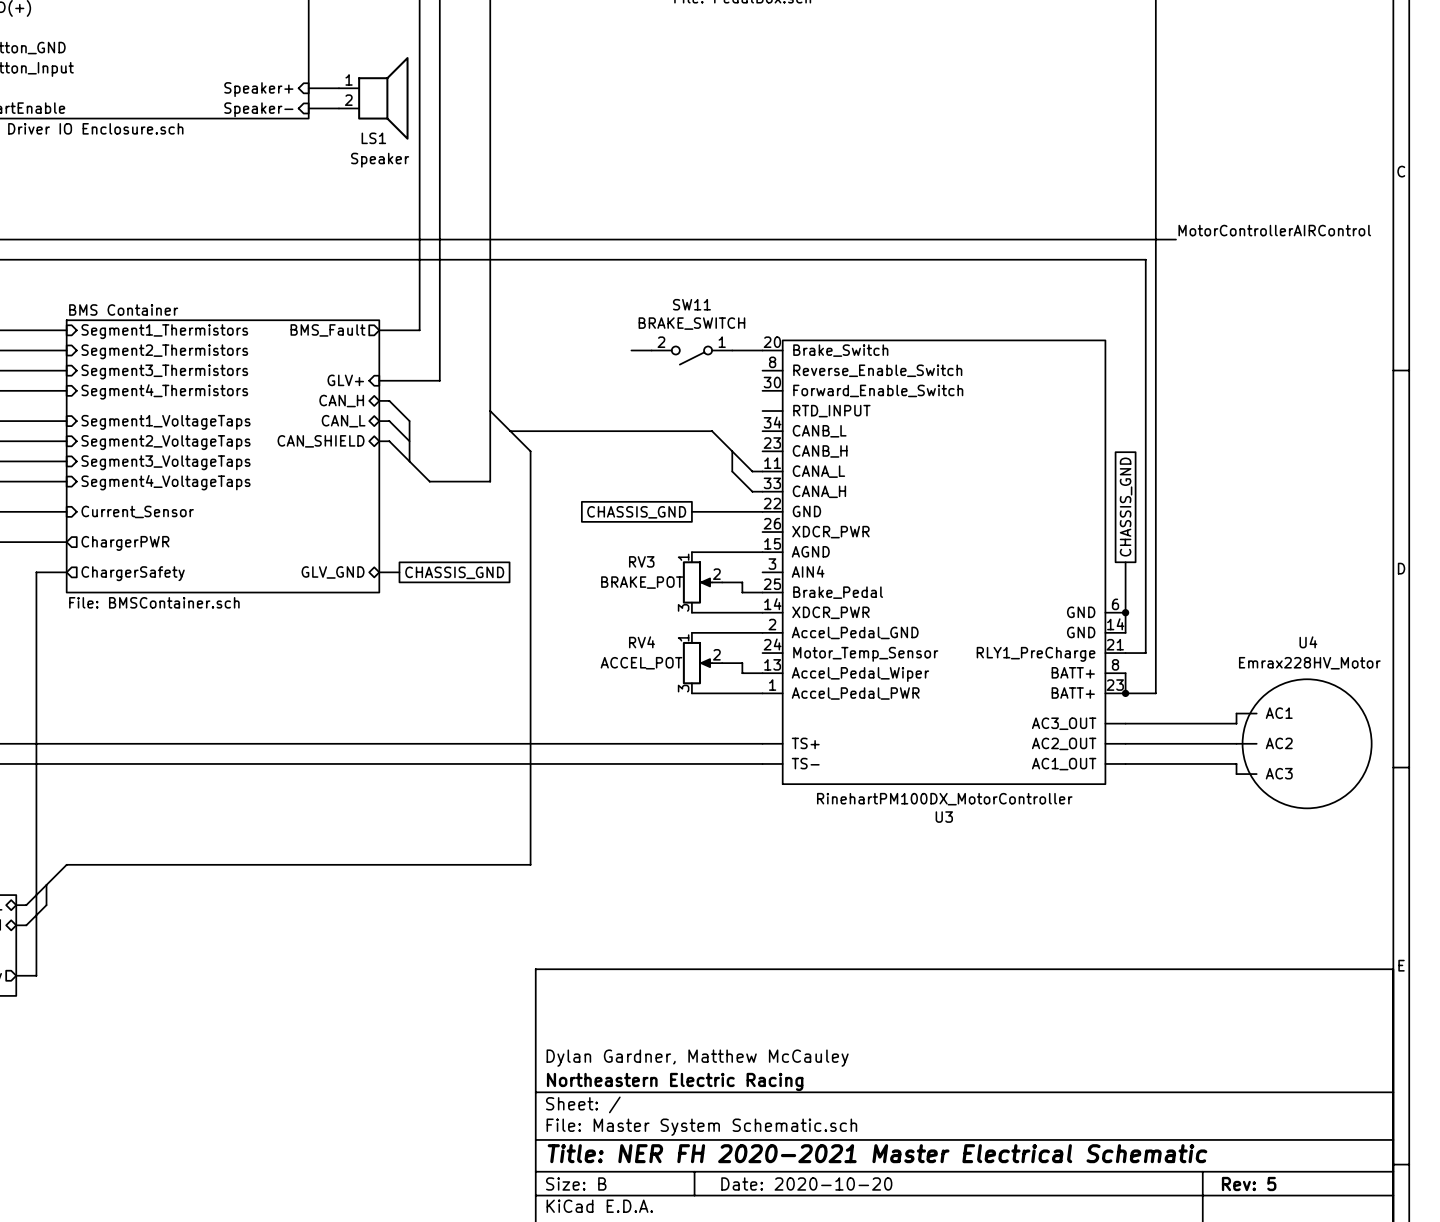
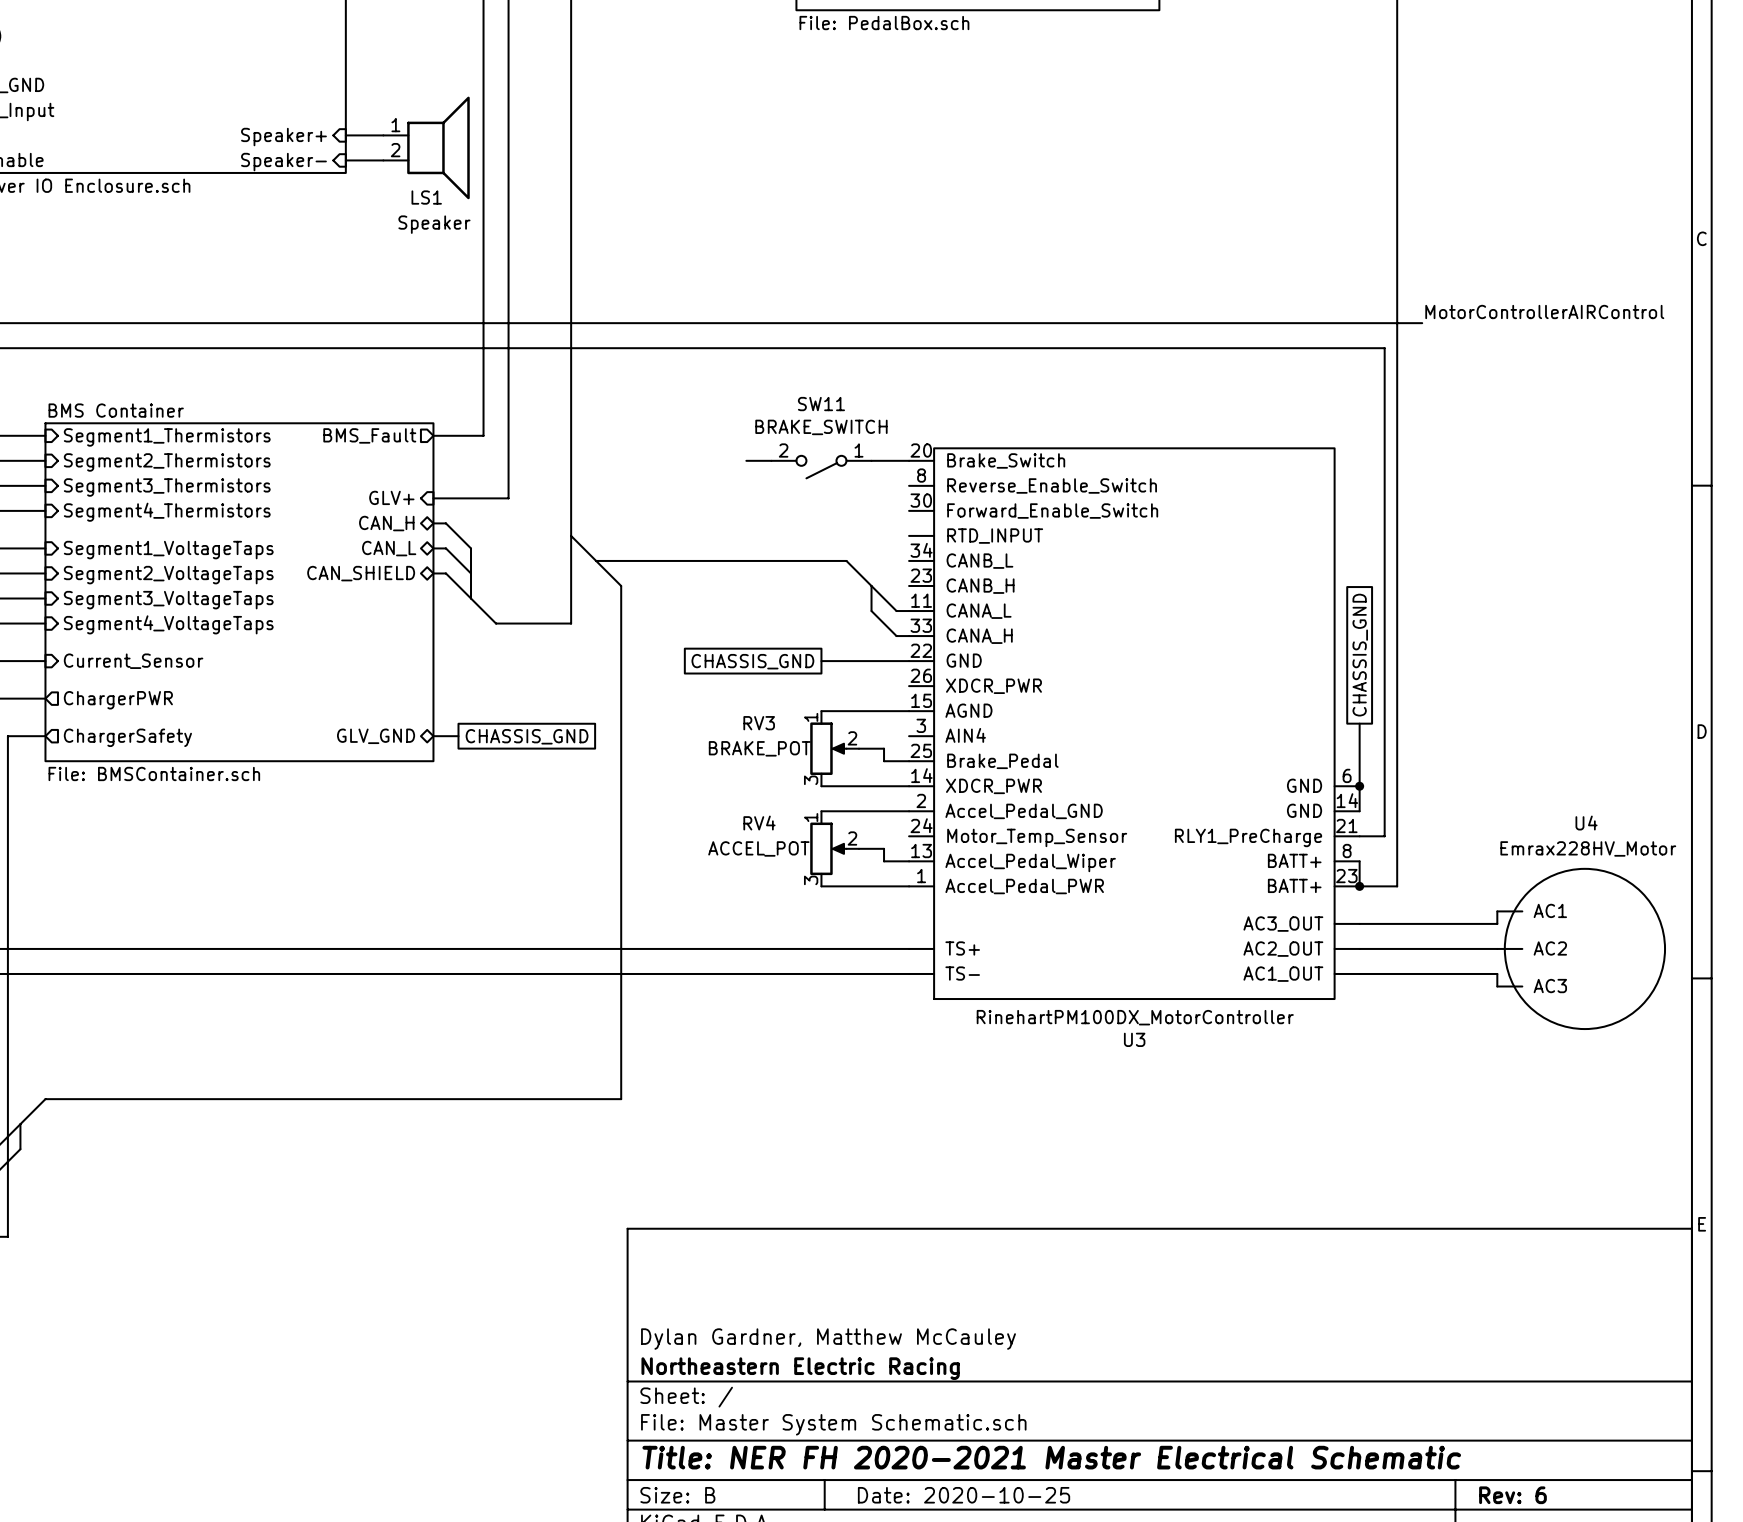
title block: Date: 2020-10-20 (806, 1183) -> Date: 2020-10-25 (964, 1495)
title block: Rev: 5 (1249, 1183) -> Rev: 6 (1512, 1495)

